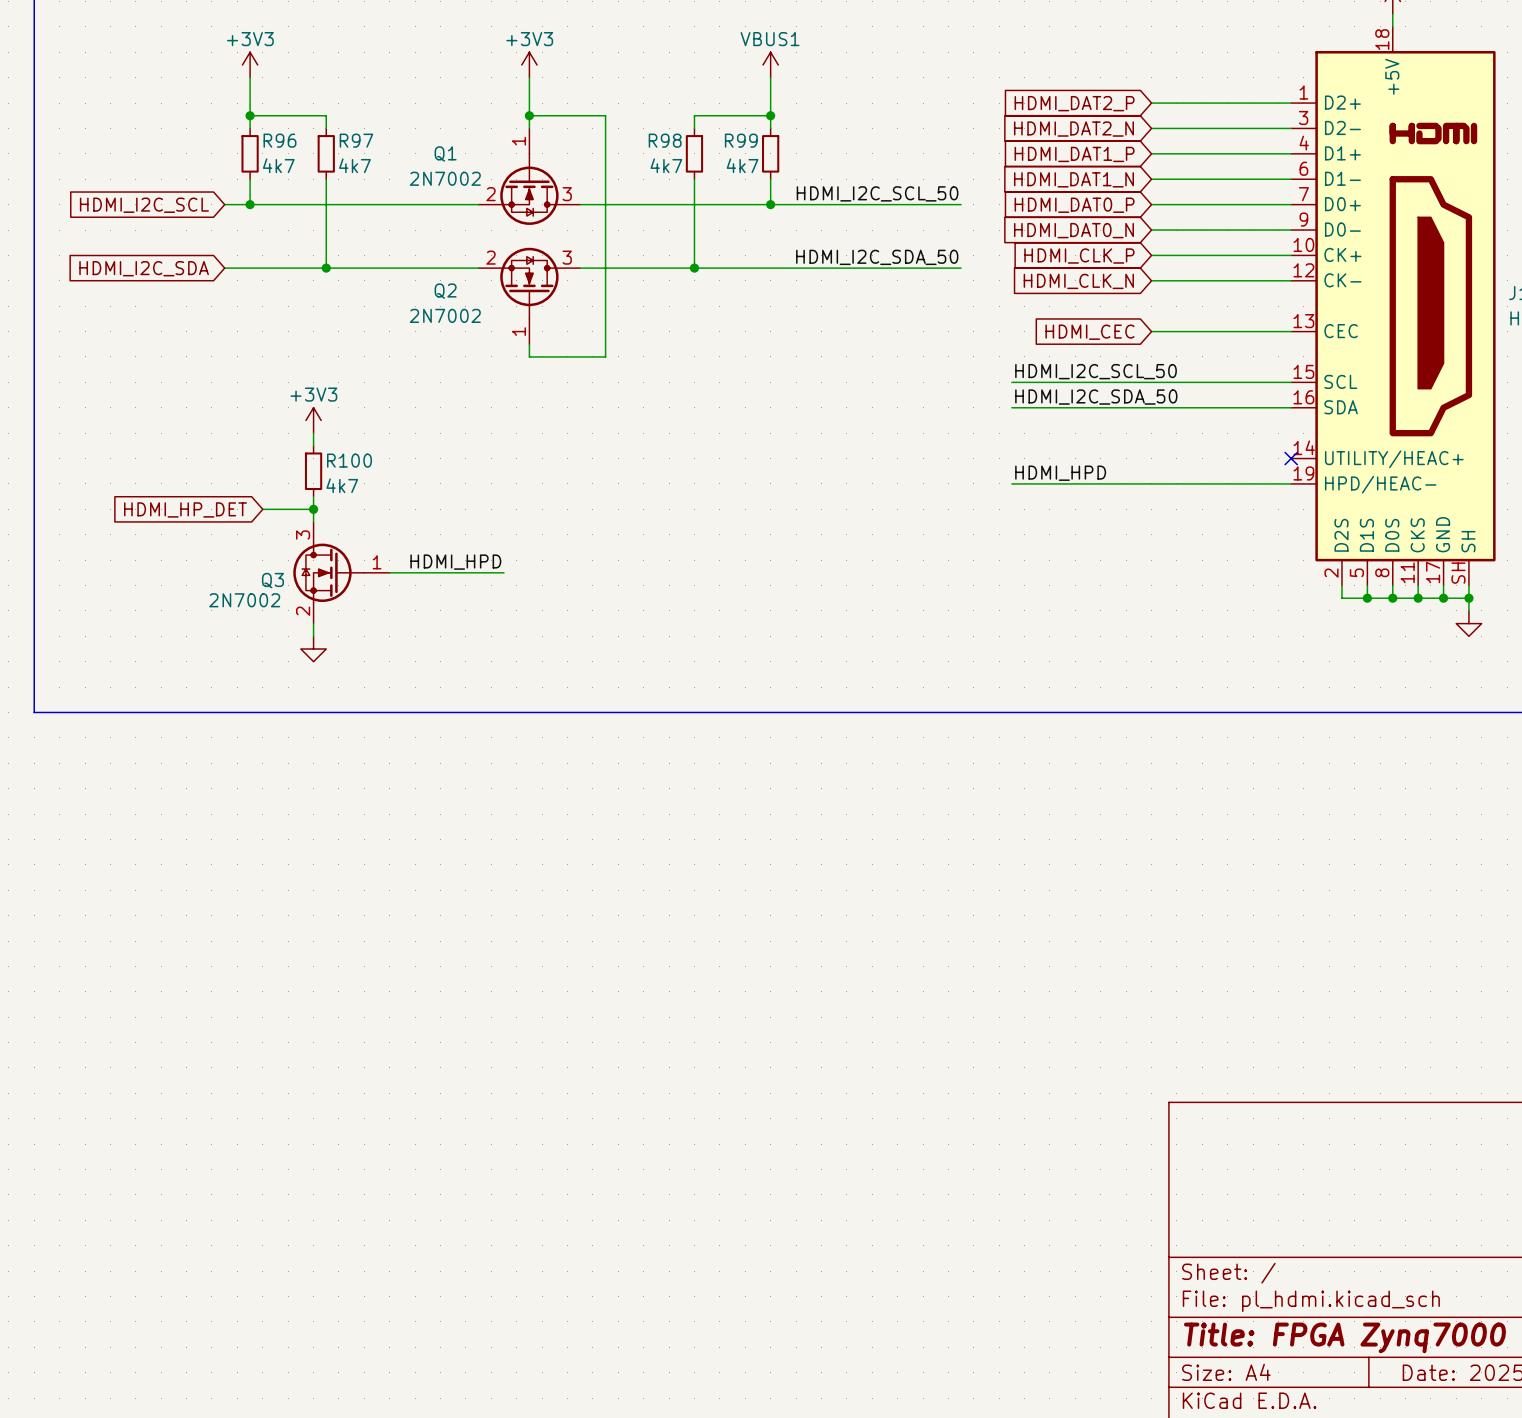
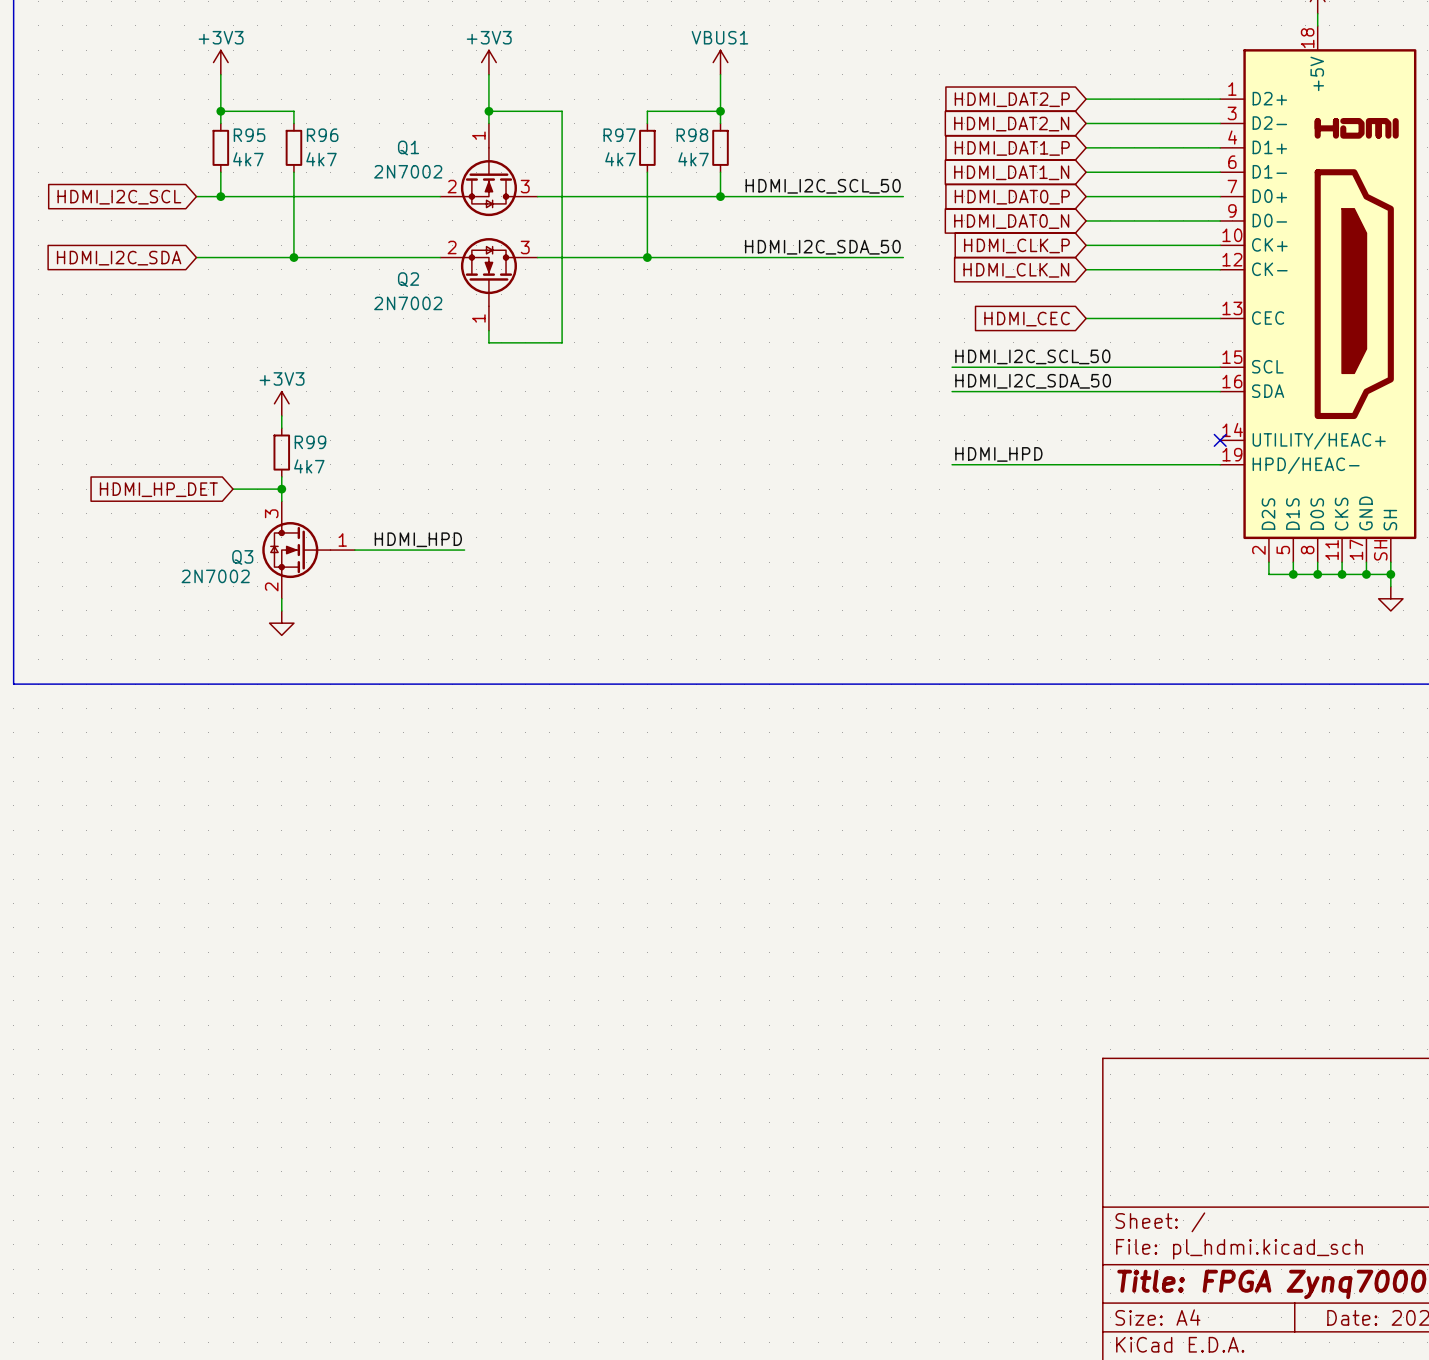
R96 name: R96 (279, 140) -> R95 (249, 135)
R97 name: R97 (356, 140) -> R96 (322, 135)
R98 name: R98 (665, 140) -> R97 (619, 135)
R99 name: R99 (741, 140) -> R98 (692, 135)
R100 name: R100 (349, 460) -> R99 (310, 442)

